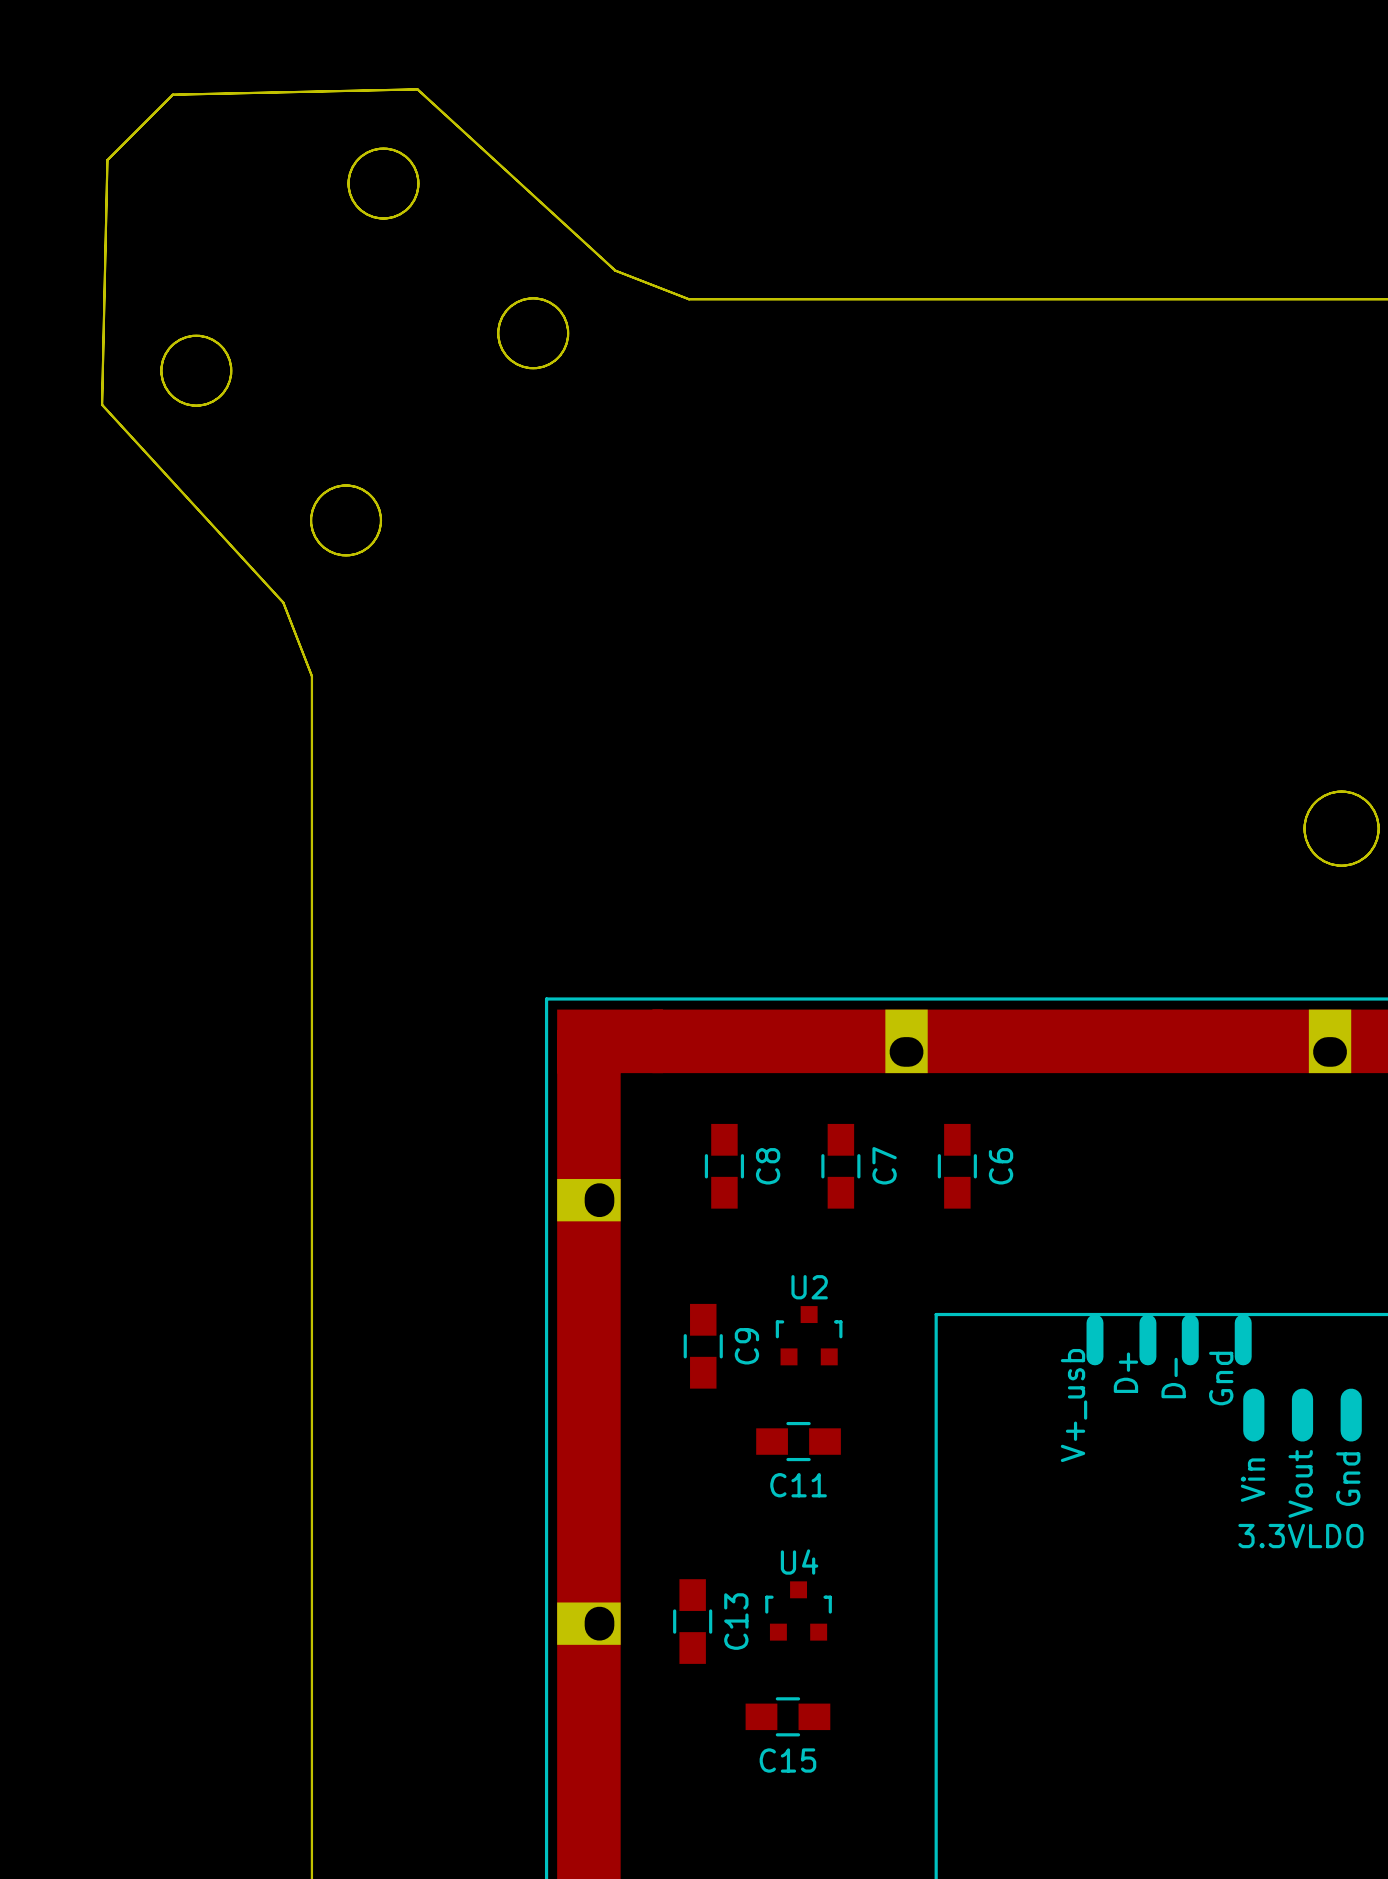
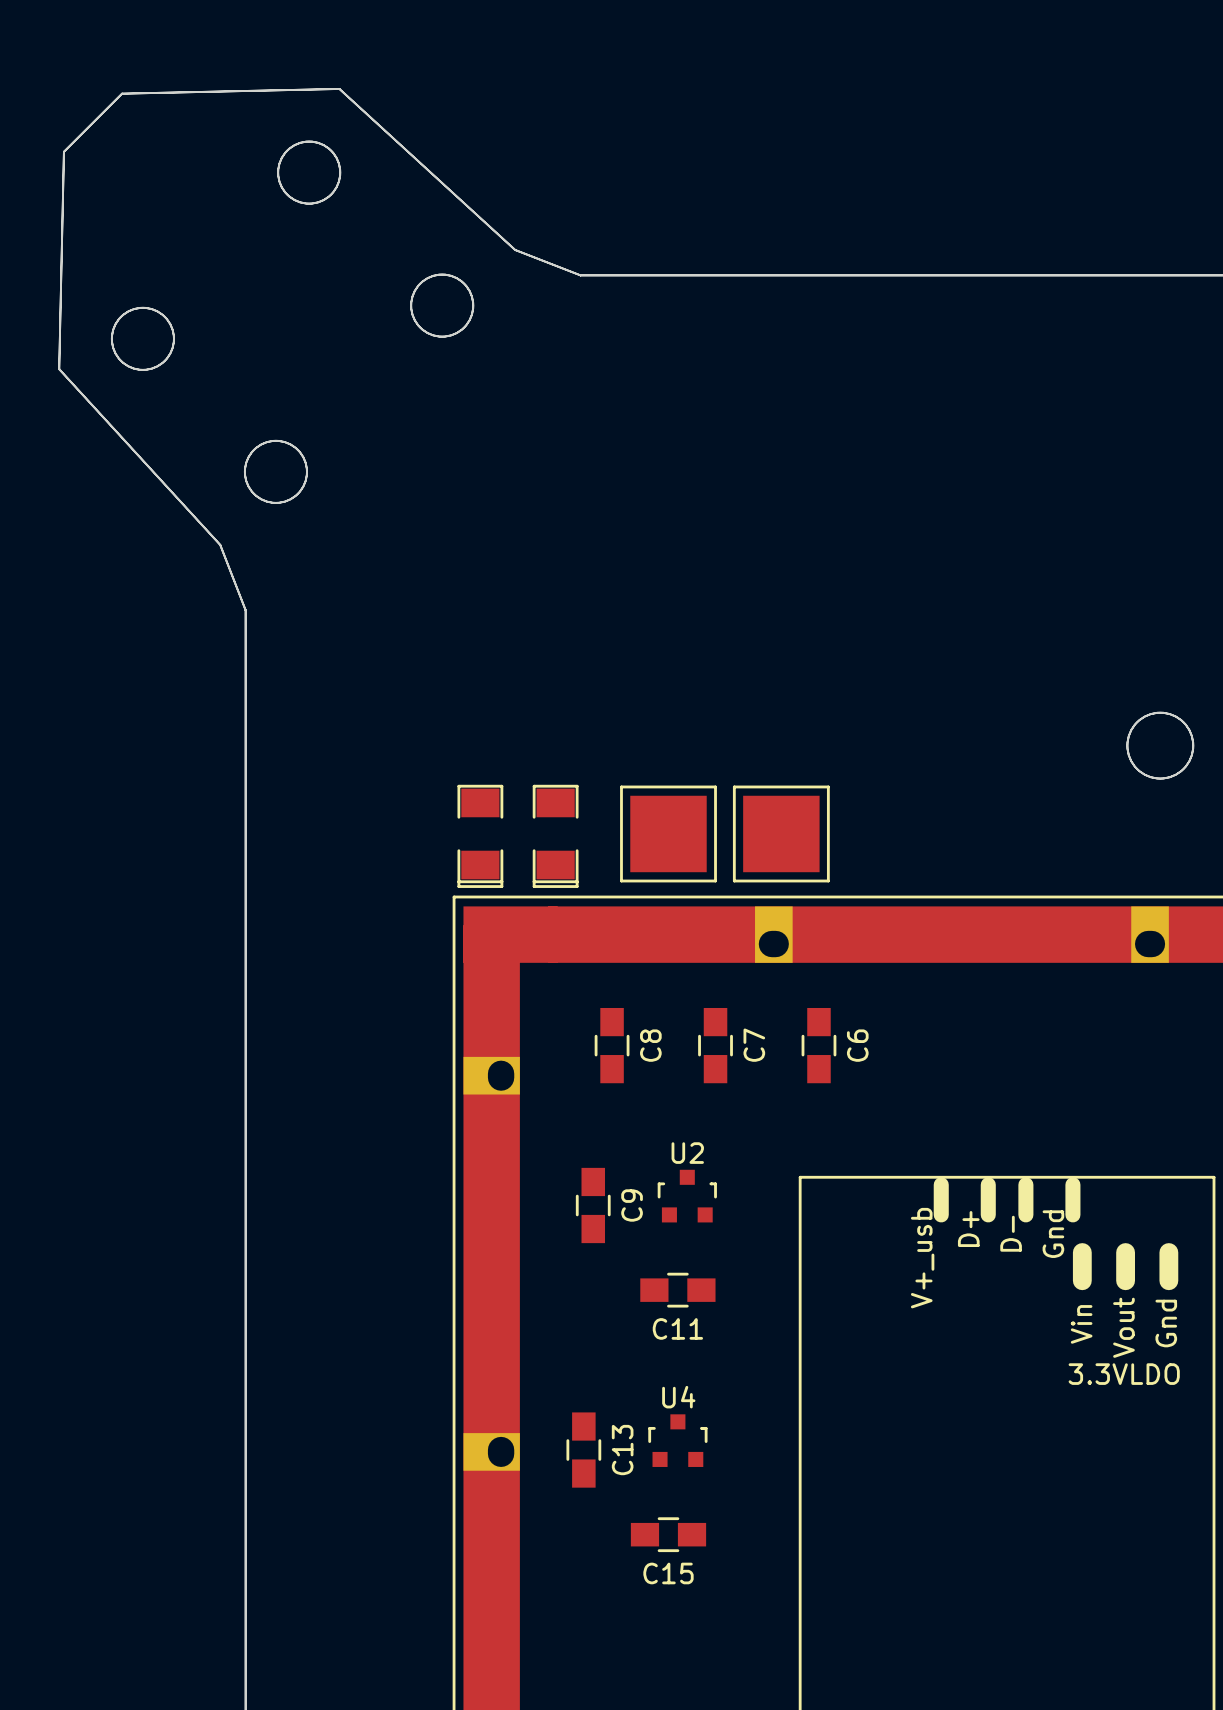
part: none -> (668, 833)
part: none -> (781, 833)
part: none -> (480, 836)
part: none -> (555, 836)

